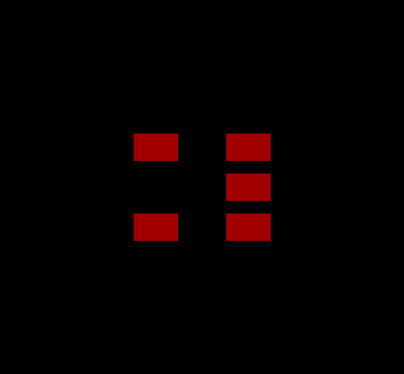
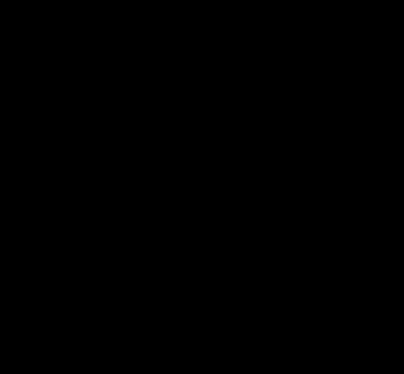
part: (202, 187) -> none

